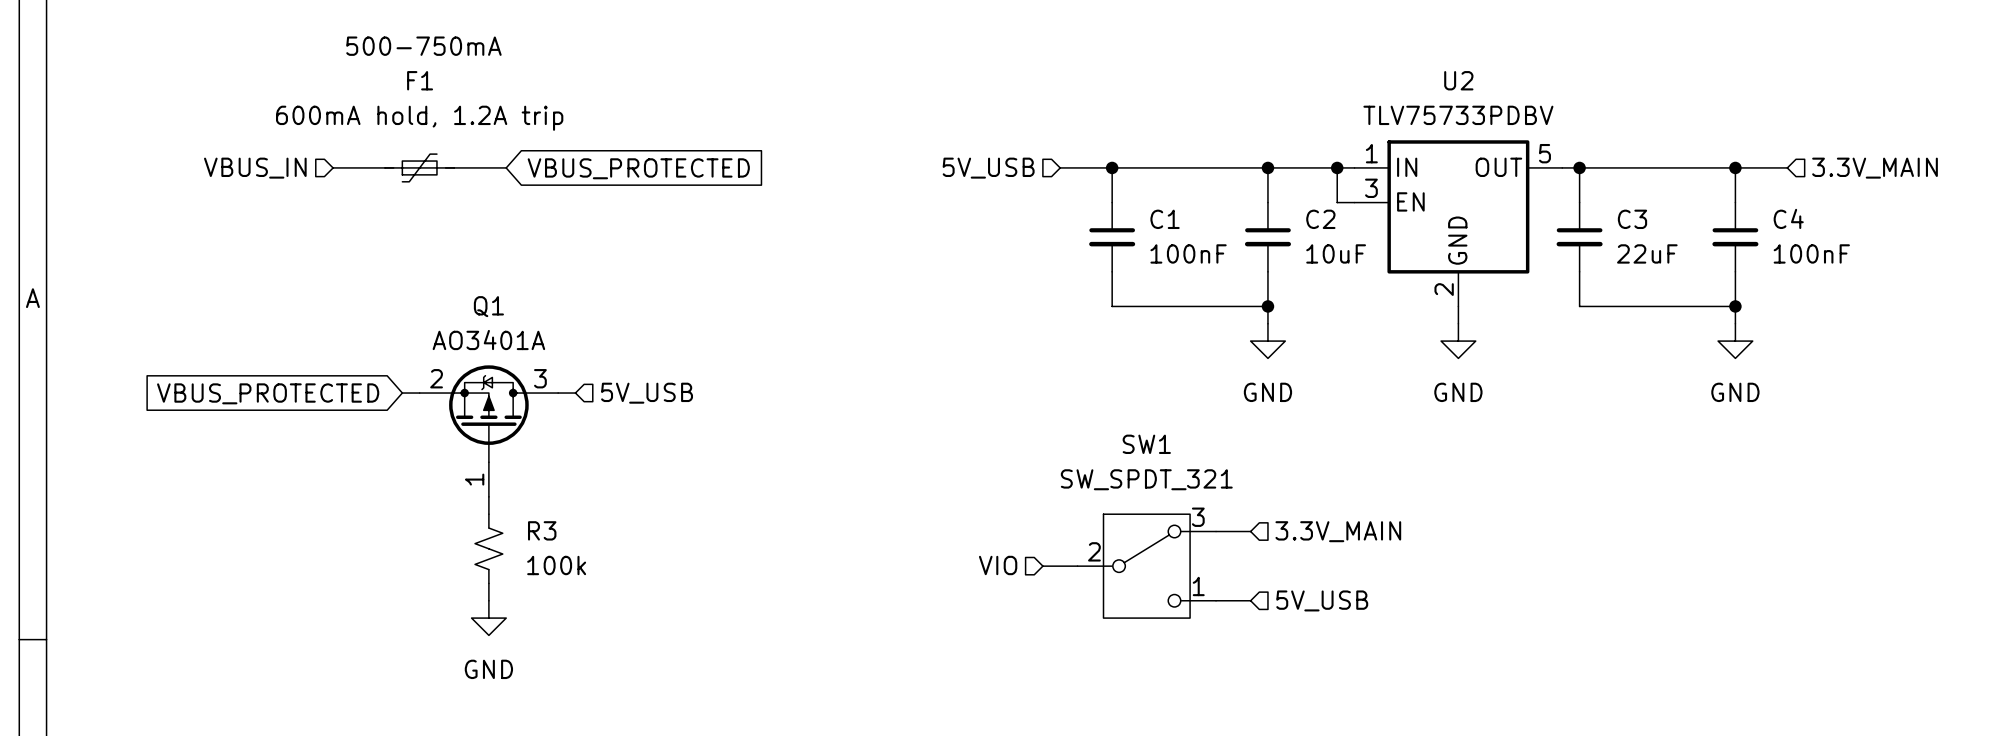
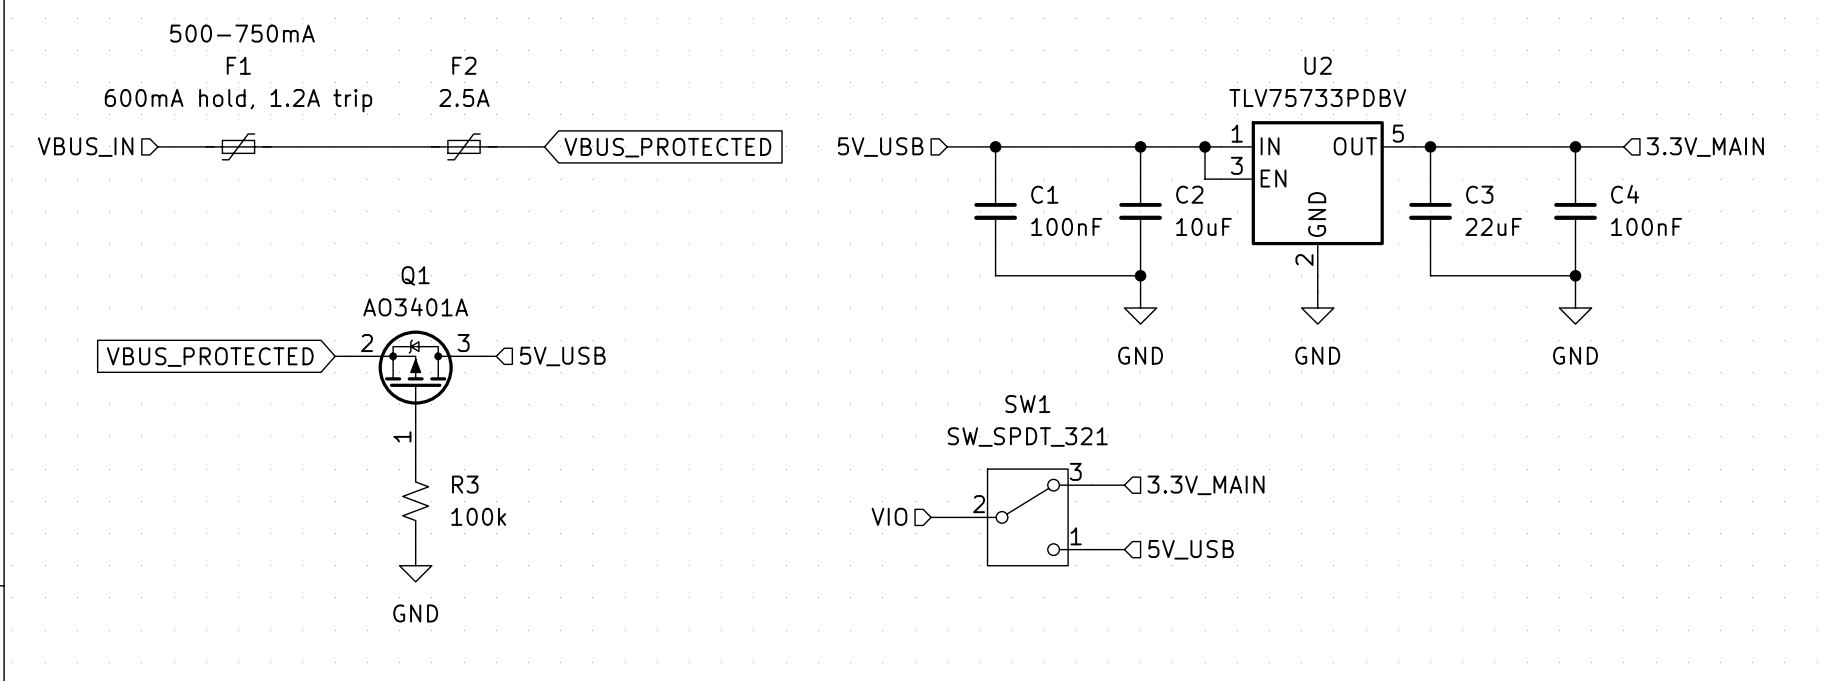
text position: 500-750mA (423, 46) -> 500-750mA (242, 33)
wire: none -> (157, 146) (206, 146)
F1 position: (419, 167) -> (238, 146)
F2: none -> 2.5A (464, 146)
wire: none -> (496, 146) (544, 146)
hierarchical label position: VBUS_IN (255, 168) -> VBUS_IN (85, 147)
global label position: VBUS_PROTECTED (638, 168) -> VBUS_PROTECTED (667, 147)

